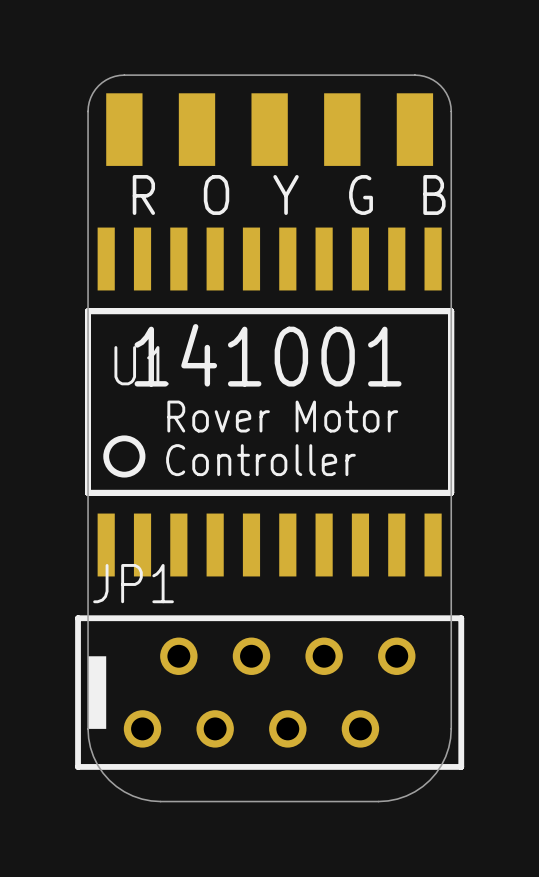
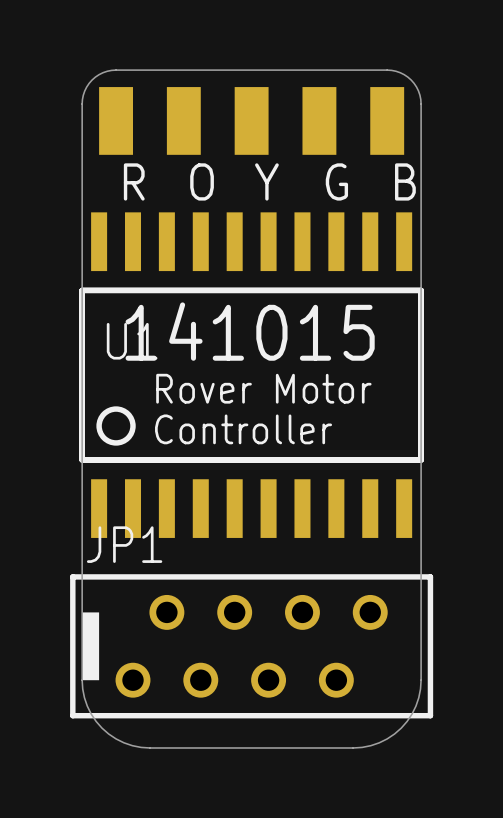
text: 141001 (268, 355) -> 141015 (250, 331)

